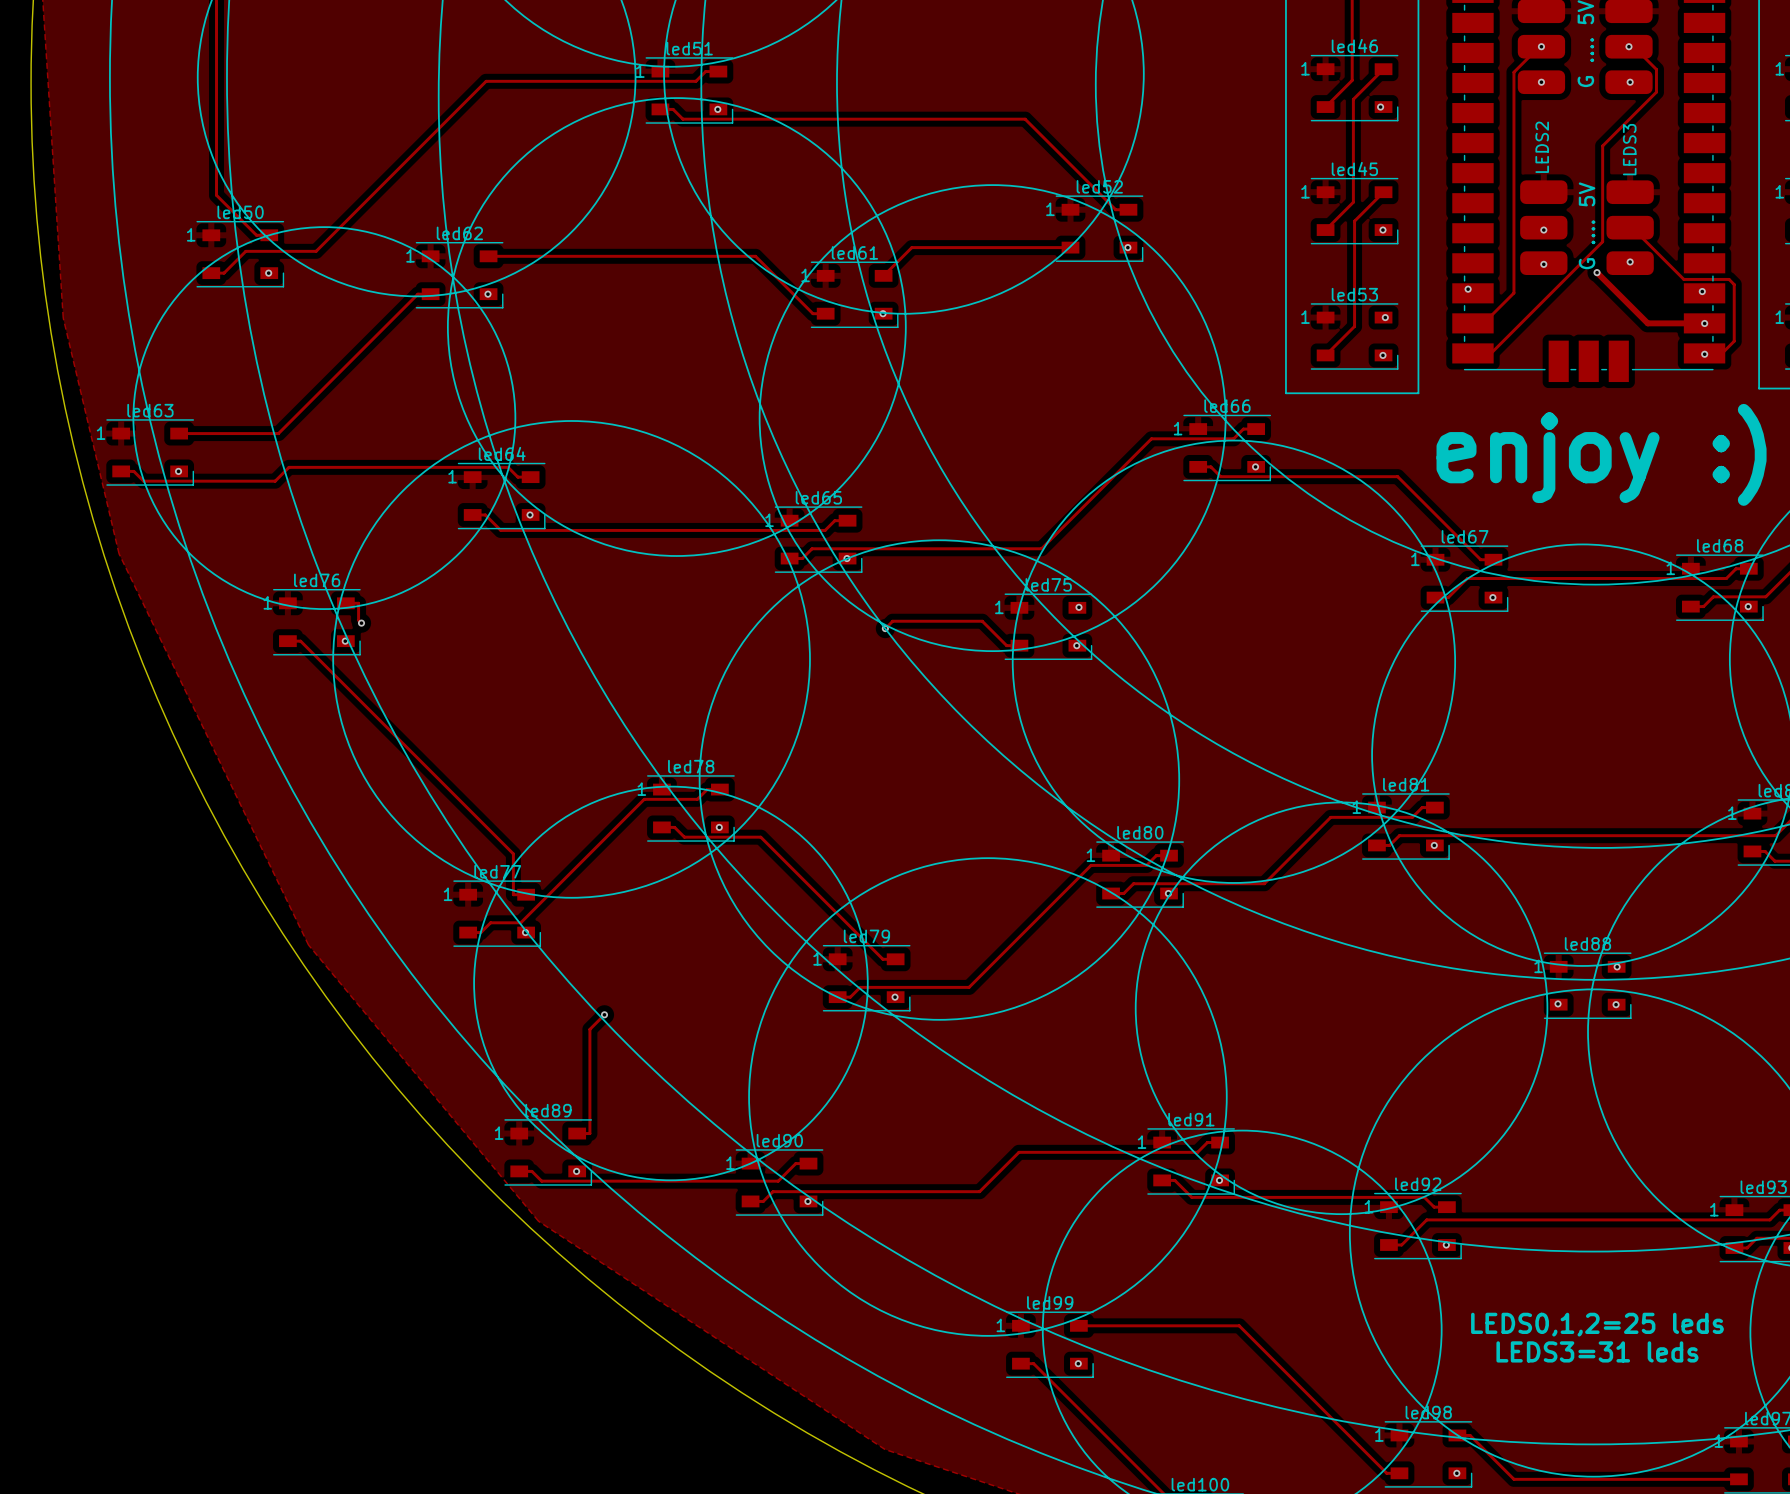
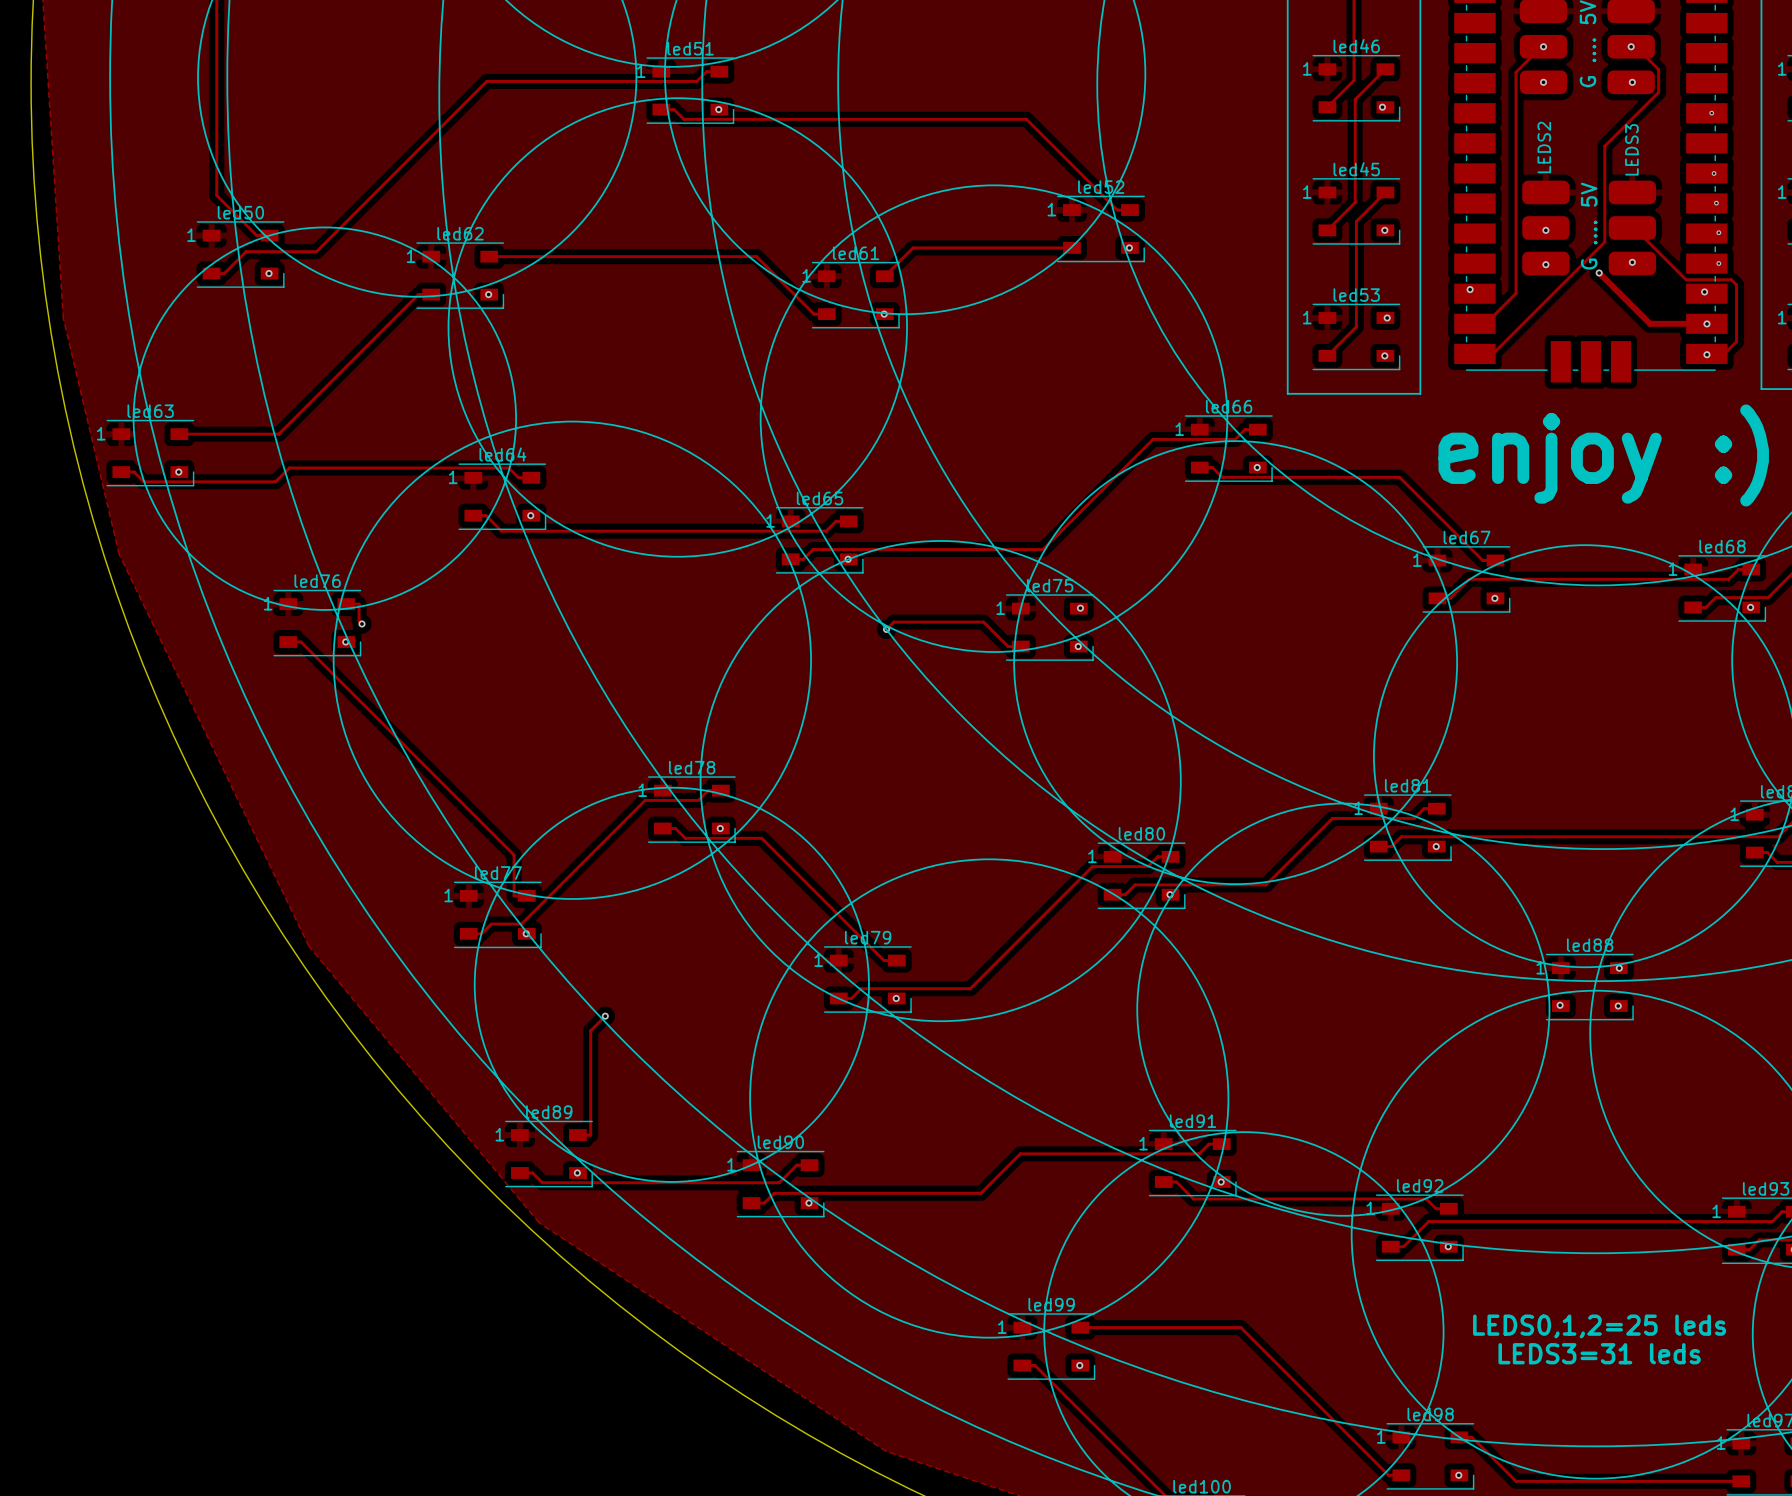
via: none -> (1711, 113)
via: none -> (1714, 173)
via: none -> (1716, 203)
via: none -> (1718, 232)
via: none -> (1718, 263)

